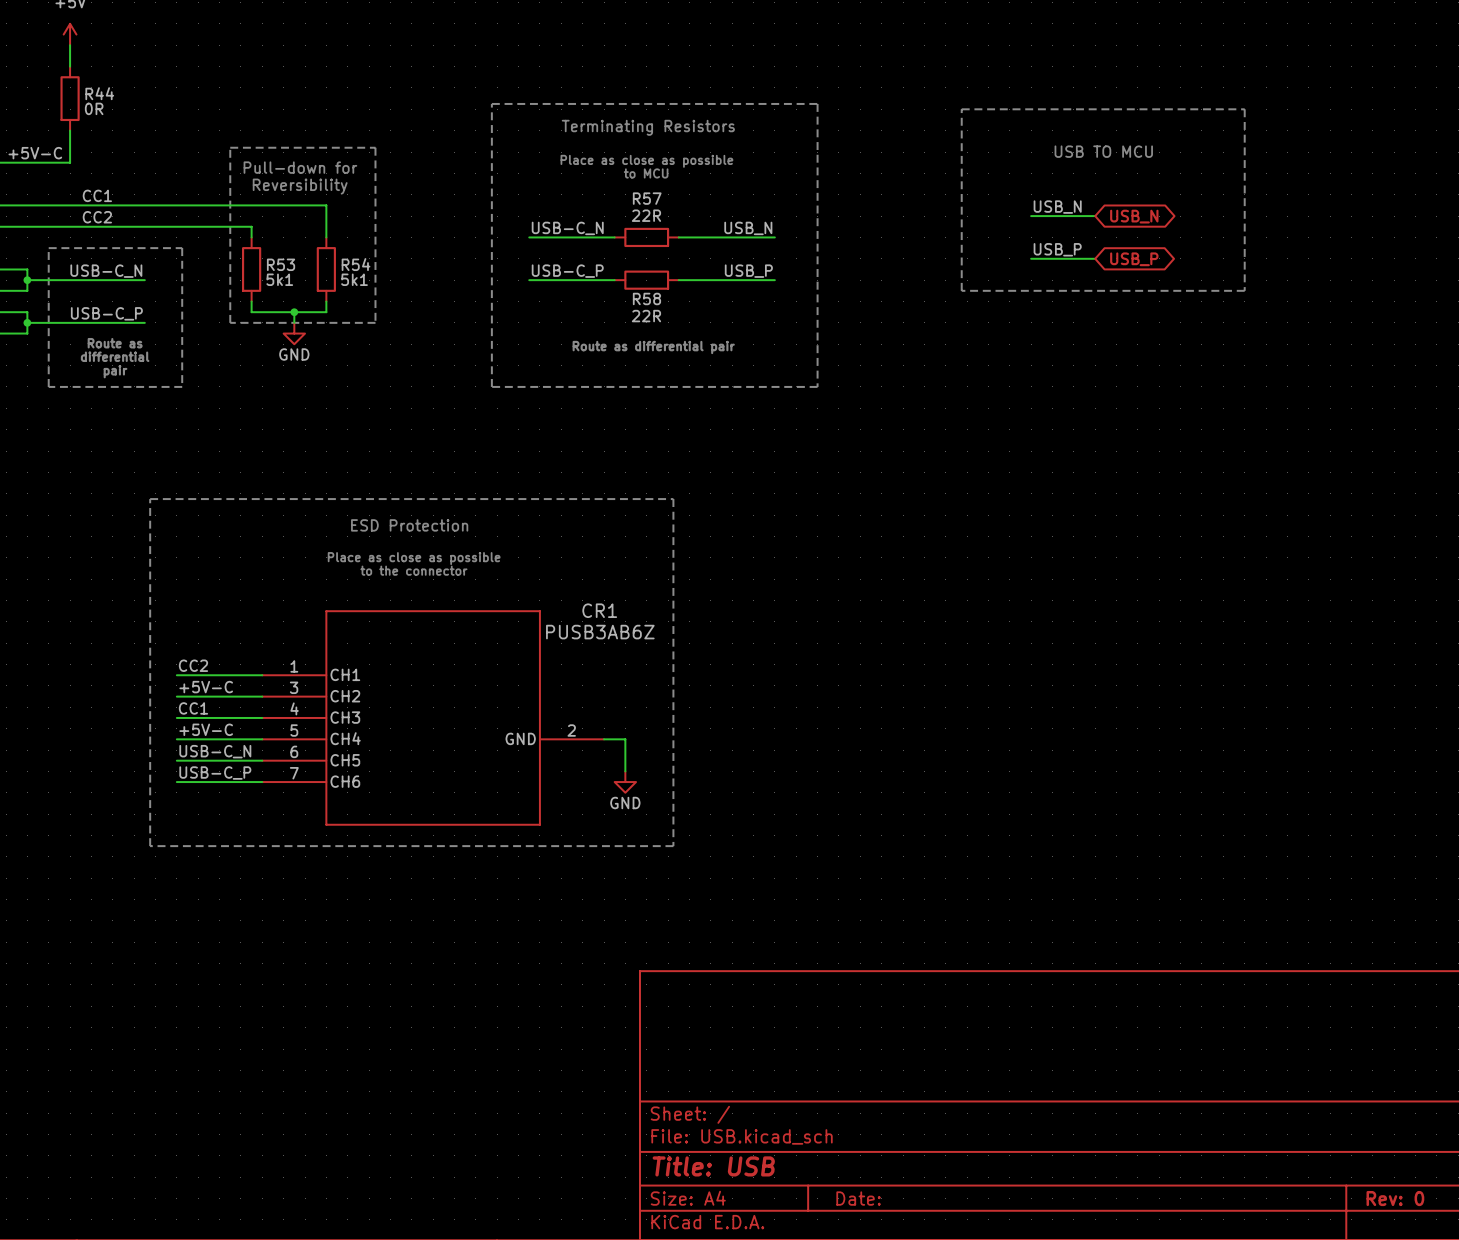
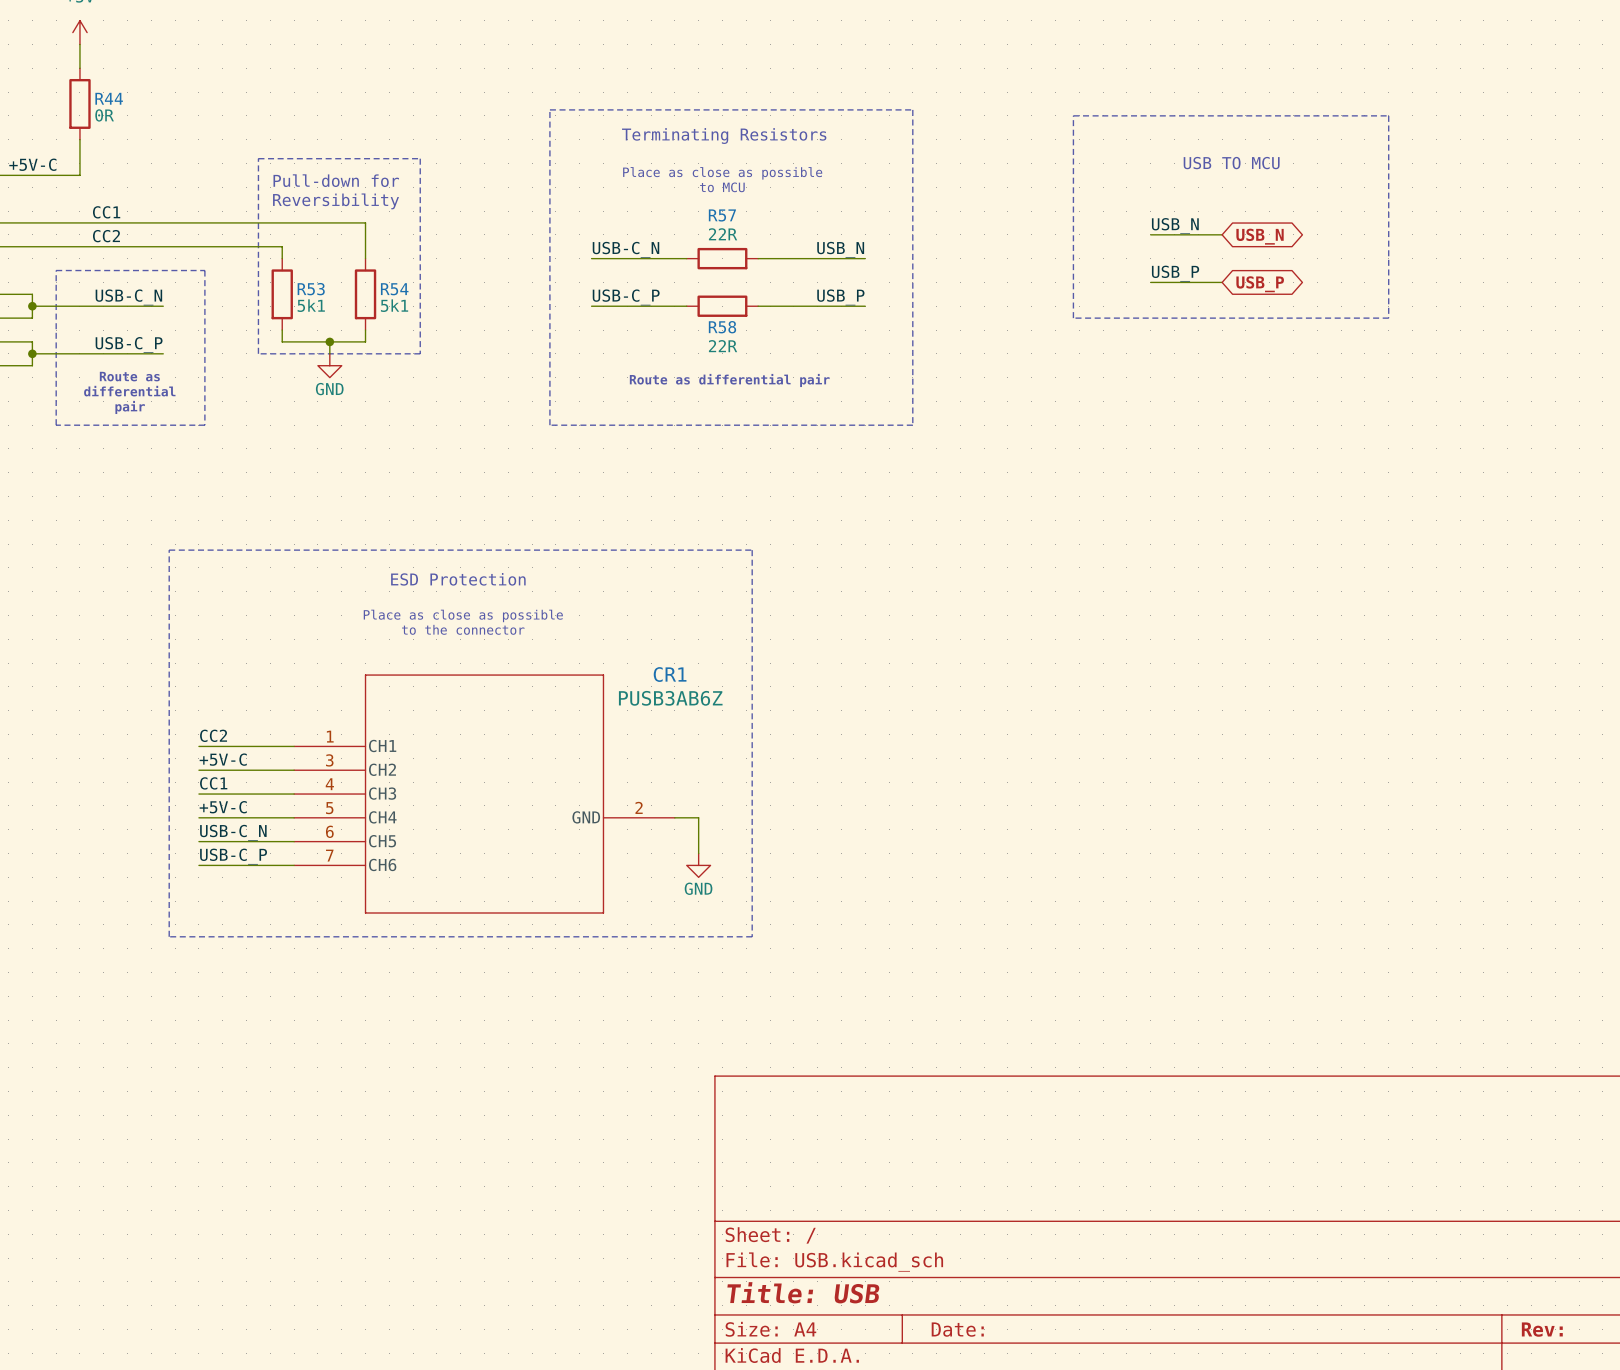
title block: Rev: 0 (1395, 1198) -> Rev: (1542, 1329)

